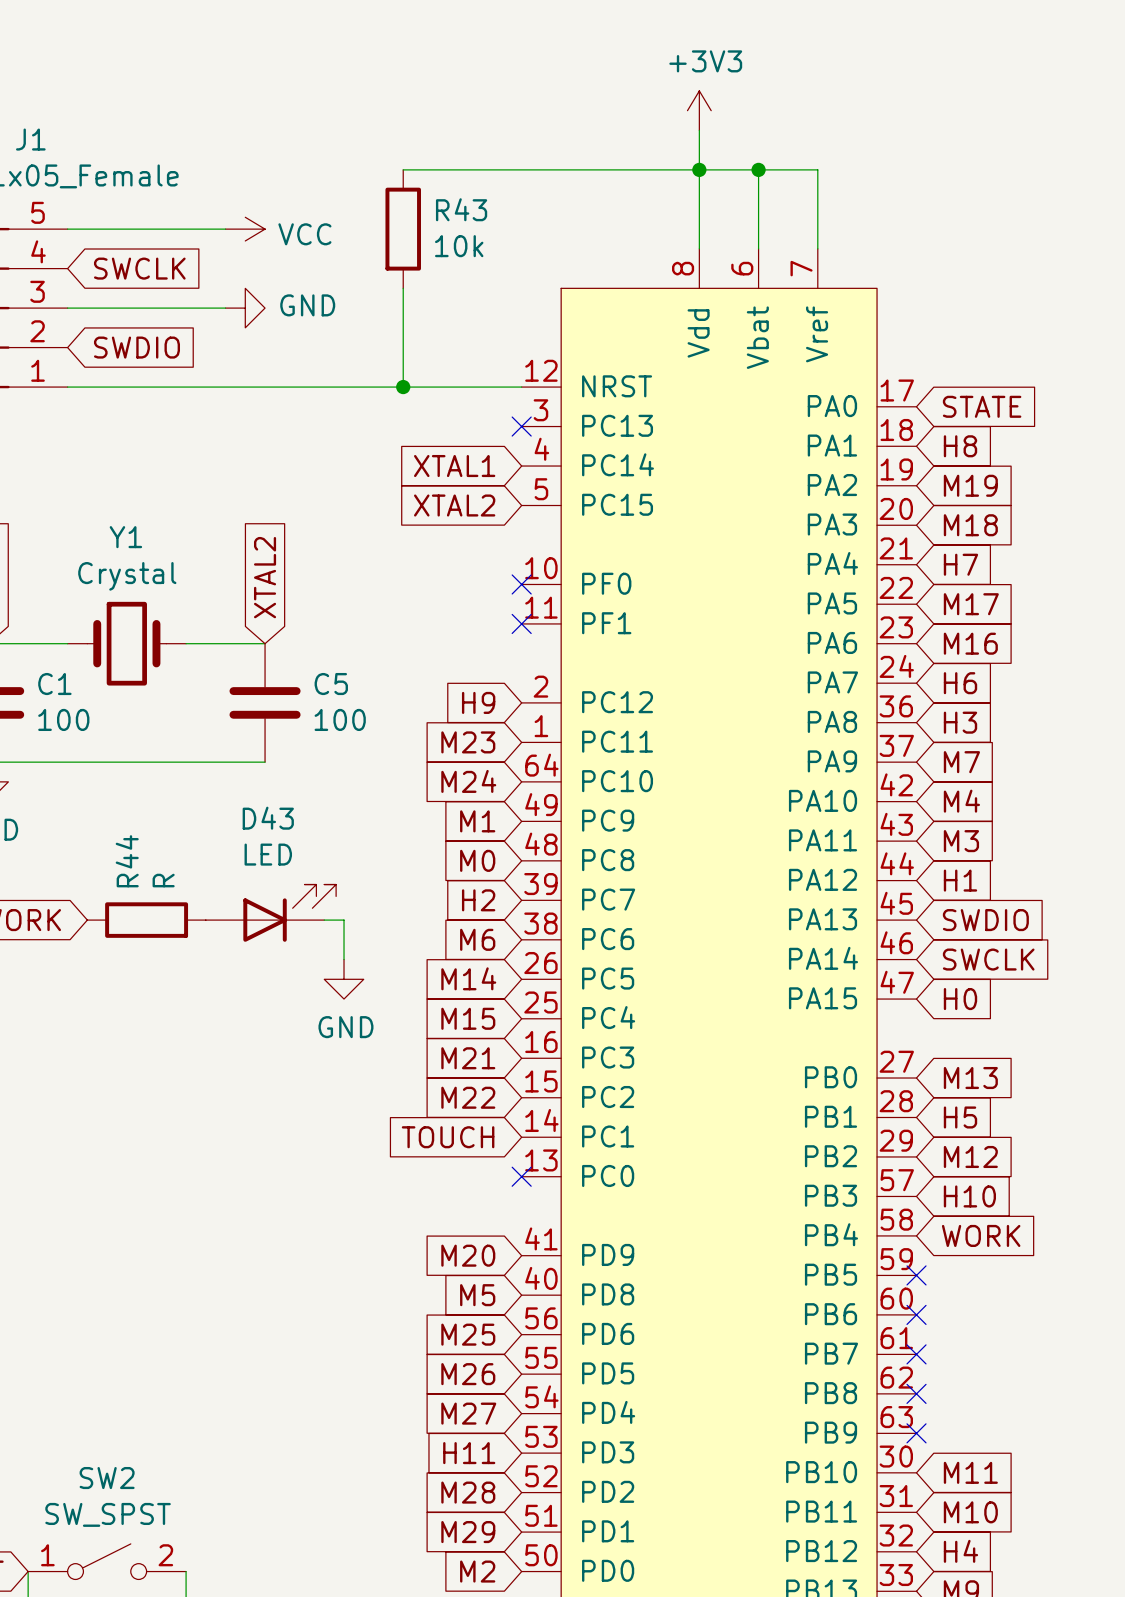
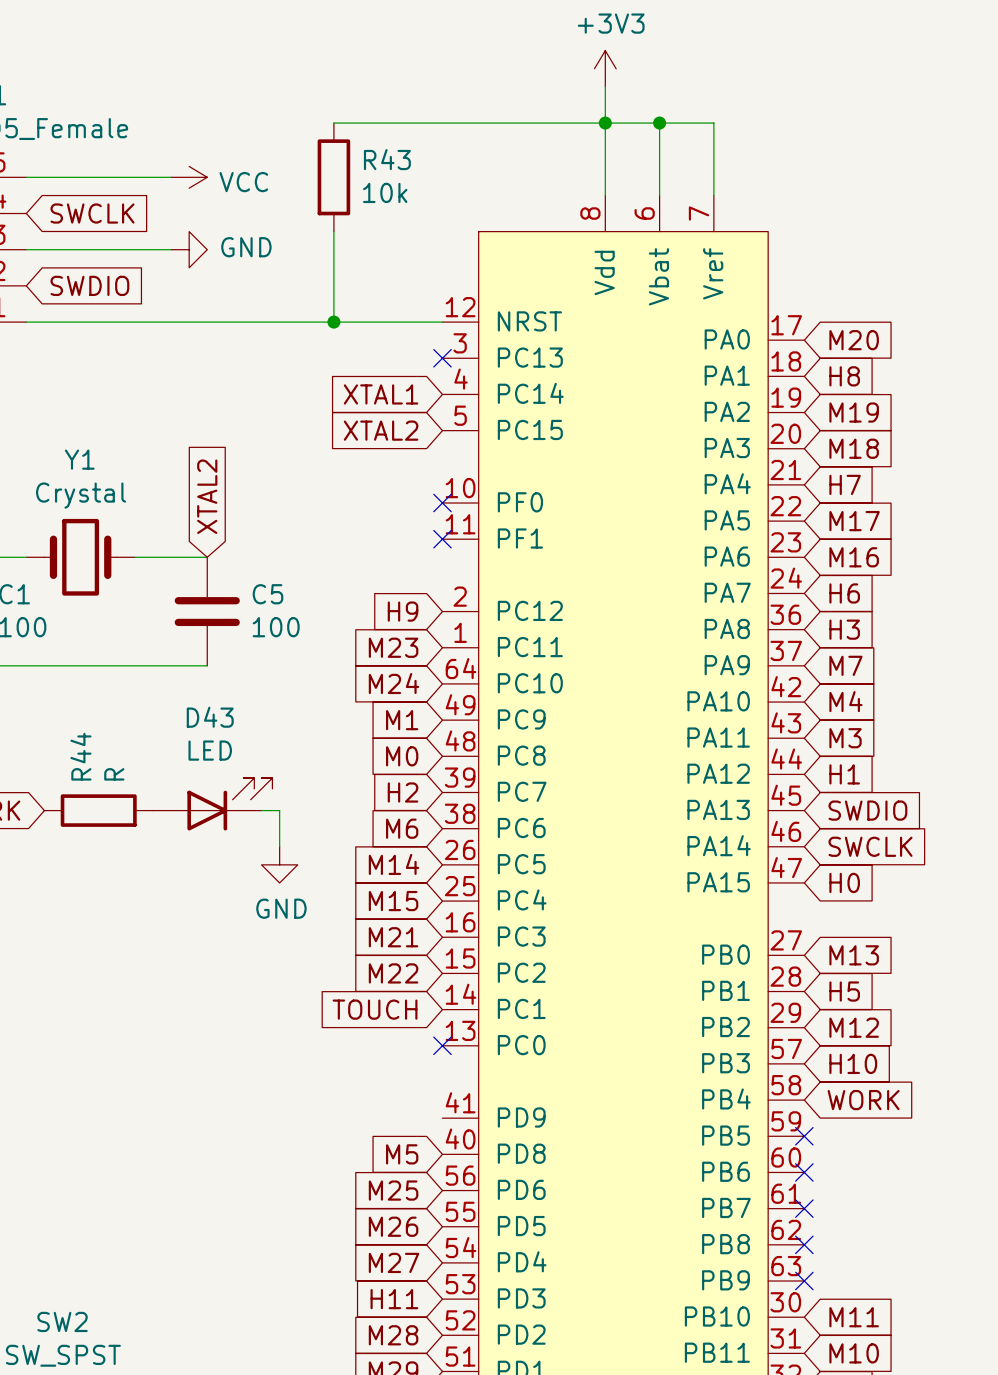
global label: STATE (982, 406) -> M20 (854, 340)
global label: M20 (468, 1255) -> none

